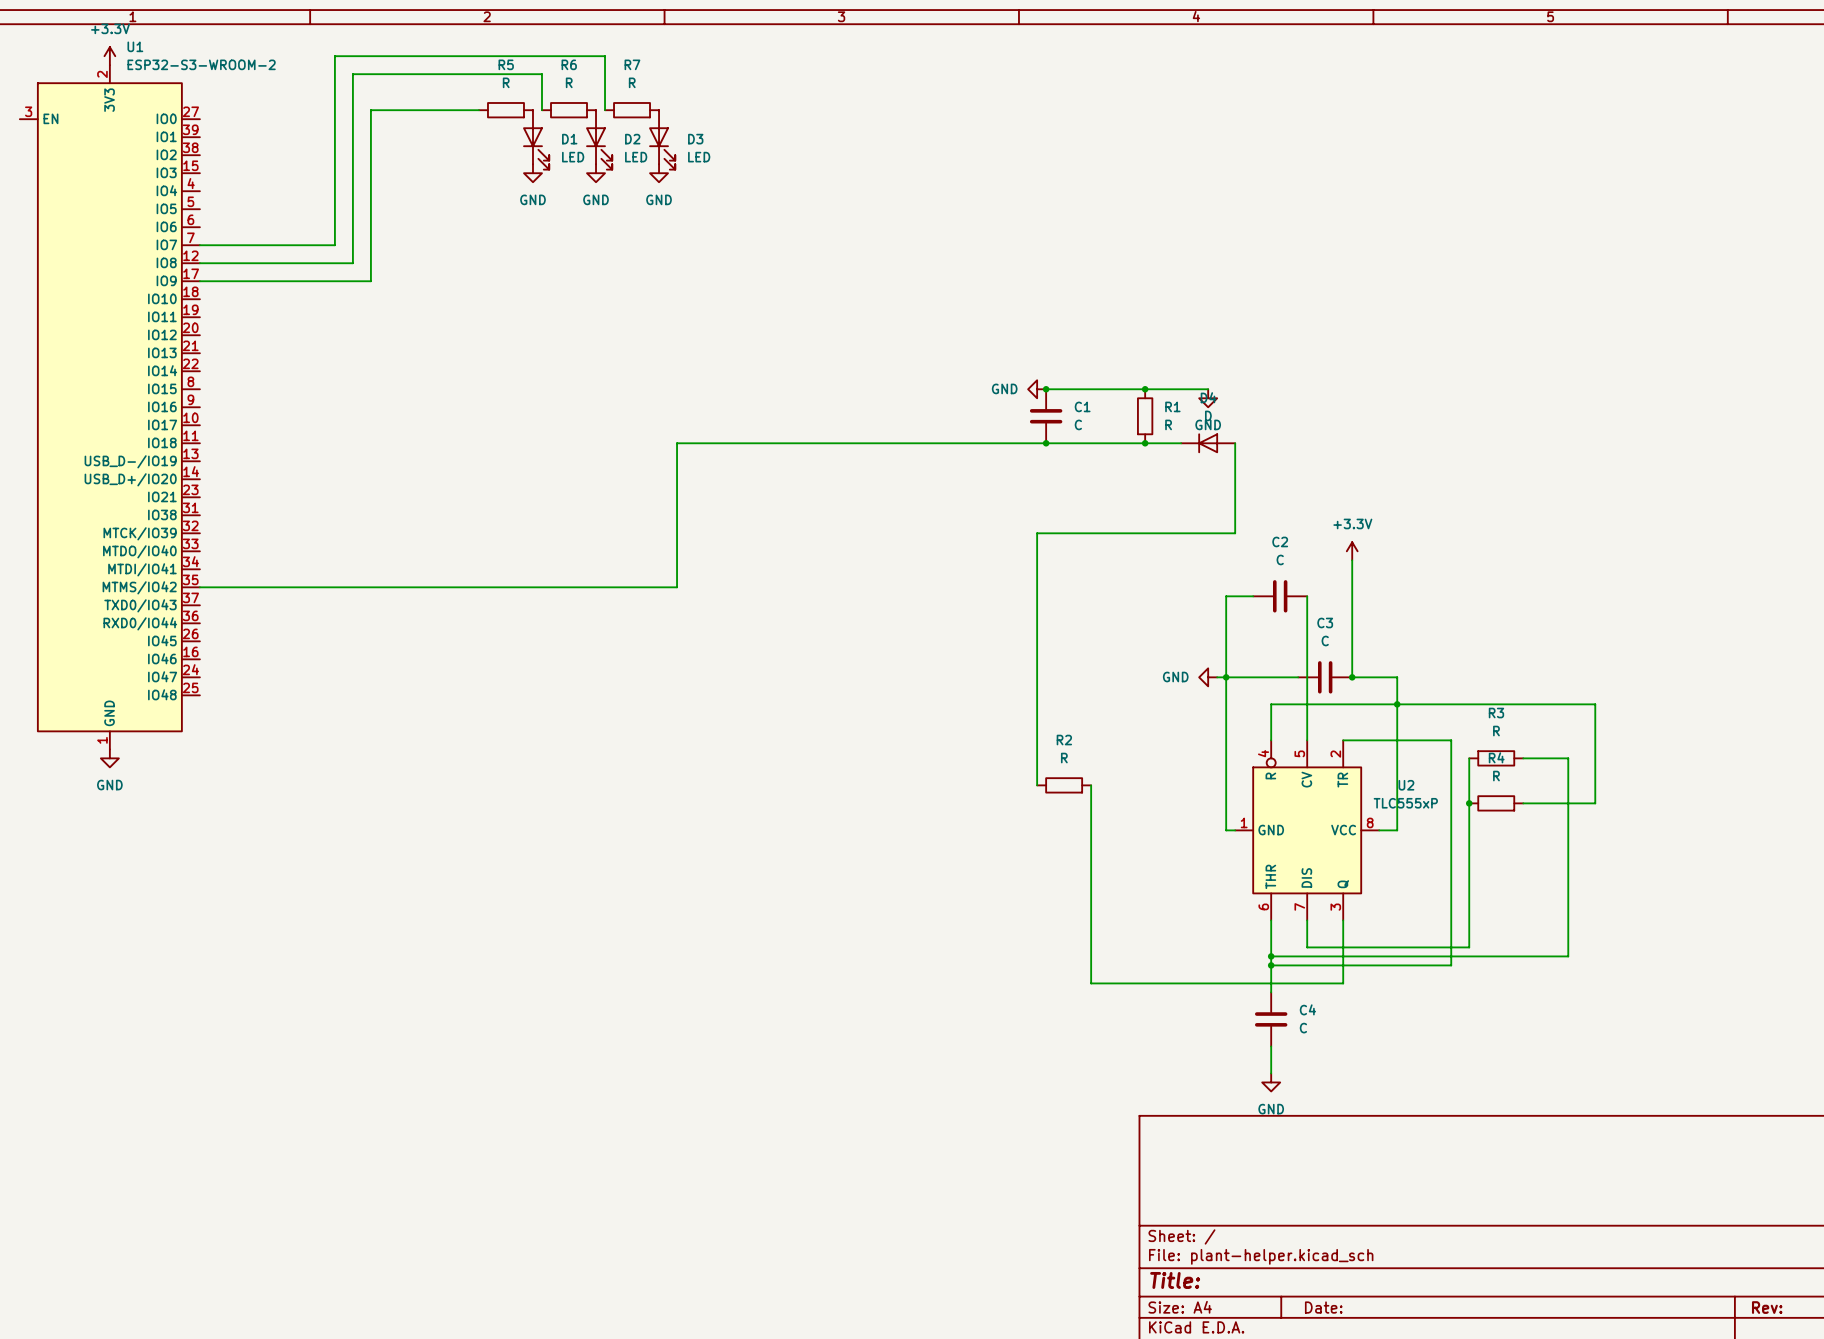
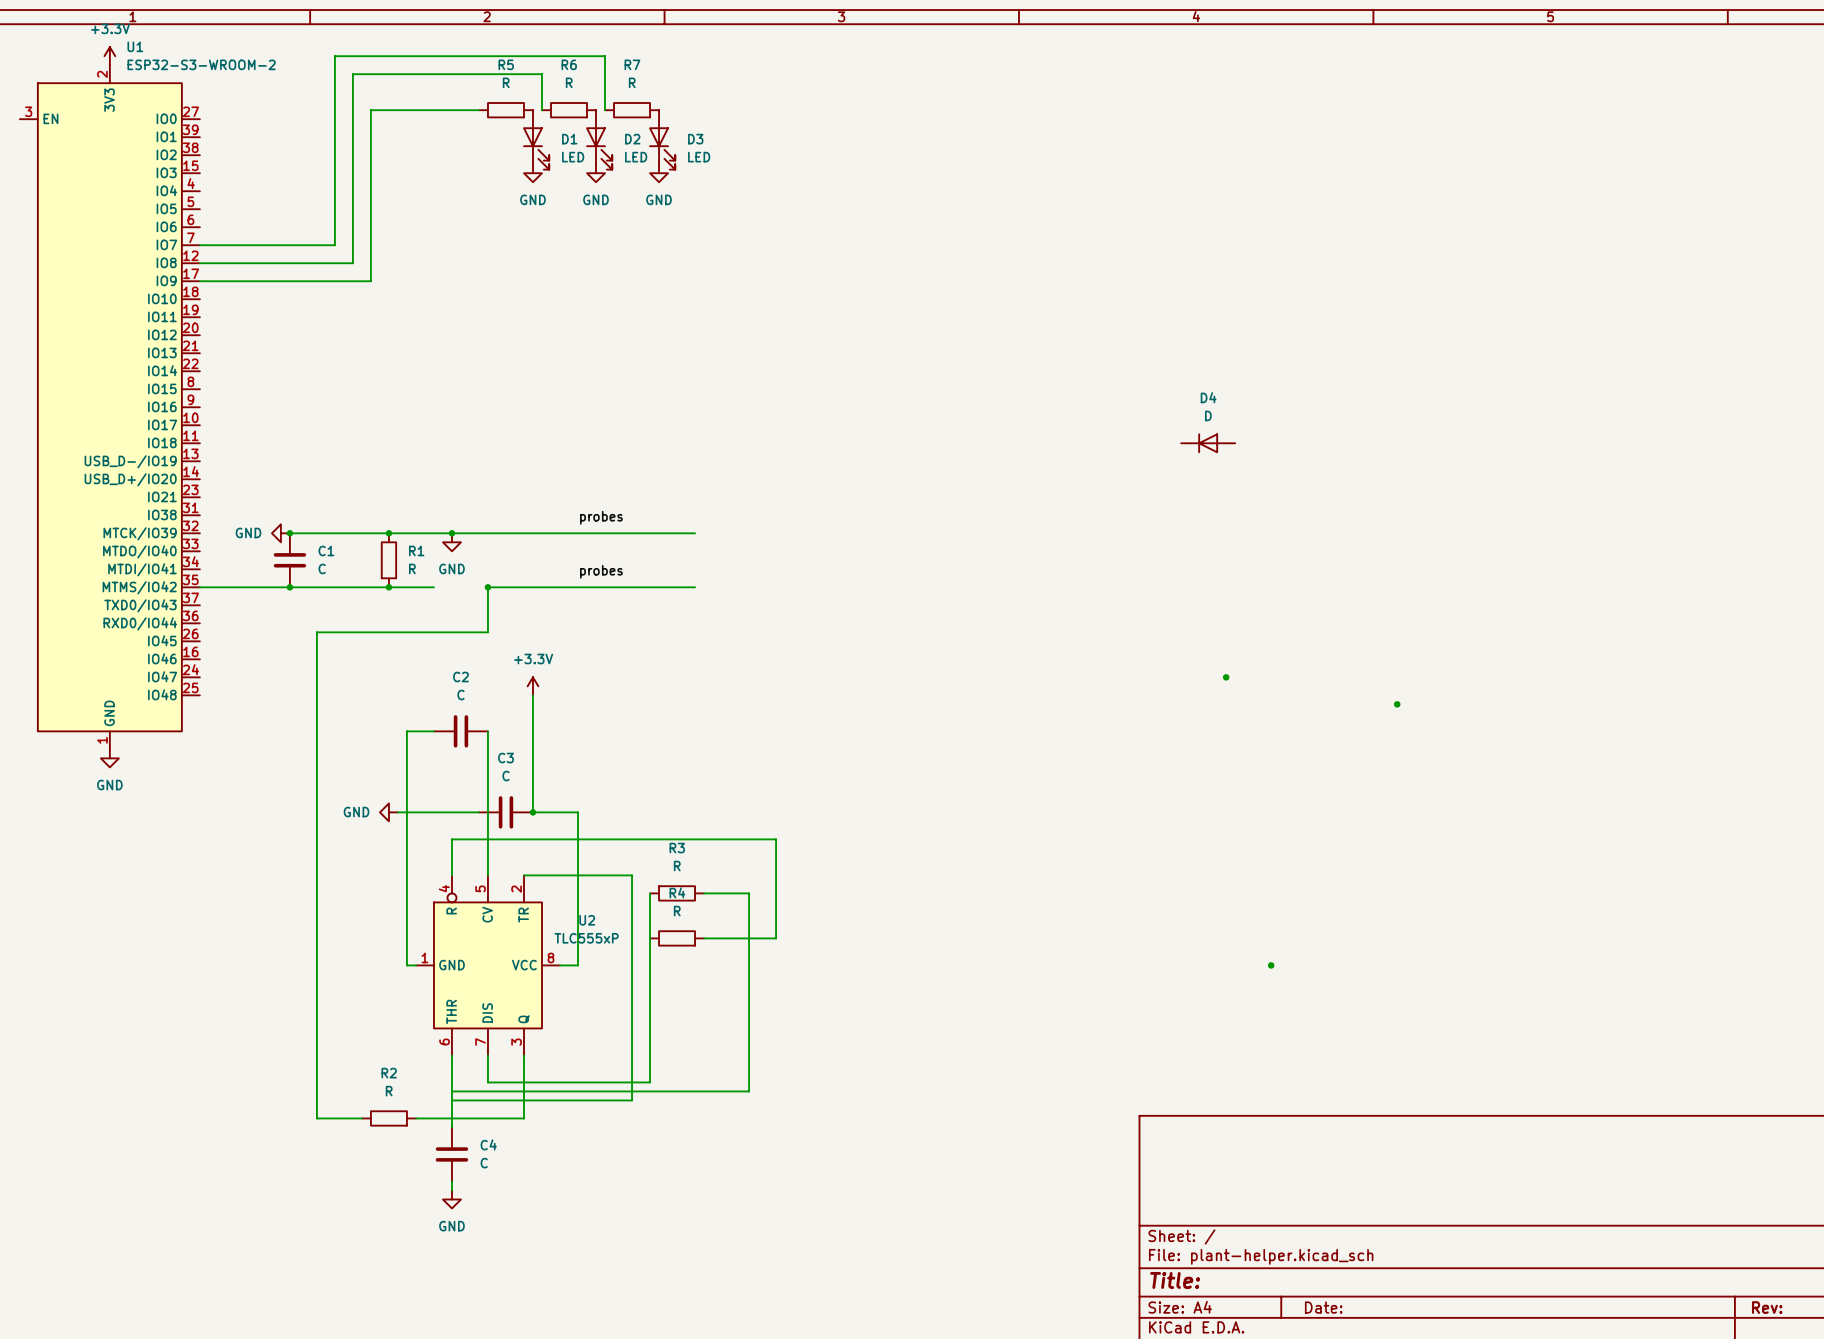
power symbol: GND (1037, 389) -> none
wire: (1046, 389) (1208, 389) -> none
junction: (1046, 389) -> none
junction: (1145, 389) -> none
power symbol: GND (1208, 398) -> none
C1 position: (1046, 416) -> (289, 560)
R1 position: (1145, 416) -> (388, 560)
junction: (1046, 443) -> none
junction: (1145, 443) -> none
wire: (1181, 443) (677, 443) (677, 587) -> (695, 587) (677, 587)
wire: (1235, 443) (1235, 533) (1037, 533) (1037, 785) -> none
label: none -> probes (601, 517)
power symbol: none -> GND (280, 533)
wire: none -> (289, 533) (695, 533)
junction: none -> (289, 533)
junction: none -> (388, 533)
junction: none -> (451, 533)
power symbol: none -> GND (451, 542)
power symbol: +3.3V (1352, 551) -> none
wire: (1352, 560) (1352, 677) (1397, 677) (1397, 830) (1379, 830) -> none
label: none -> probes (601, 571)
junction: none -> (289, 587)
junction: none -> (388, 587)
wire: (433, 587) (487, 587) -> (361, 1118) (316, 1118) (316, 632) (487, 632) (487, 587)
junction: none -> (487, 587)
wire: (1253, 596) (1226, 596) (1226, 830) (1235, 830) -> none
C2 position: (1280, 596) -> (460, 731)
wire: (1307, 596) (1307, 740) -> none
power symbol: GND (1208, 677) -> none
wire: (1217, 677) (1298, 677) -> none
C3 position: (1325, 677) -> (505, 812)
junction: (1352, 677) -> none
power symbol: none -> +3.3V (532, 686)
wire: none -> (532, 695) (532, 812) (578, 812) (578, 965) (560, 965)
wire: none -> (433, 731) (406, 731) (406, 965) (415, 965)
wire: none -> (487, 731) (487, 875)
wire: (1271, 740) (1271, 704) (1595, 704) (1595, 803) (1523, 803) -> none
wire: (1343, 740) (1451, 740) (1451, 965) (1271, 965) -> none
wire: (1469, 758) (1469, 947) (1307, 947) (1307, 920) -> none
R3 position: (1496, 758) -> (677, 893)
wire: (1523, 758) (1568, 758) (1568, 956) (1271, 956) -> none
R2 position: (1064, 785) -> (388, 1118)
wire: (1091, 785) (1091, 983) (1343, 983) (1343, 920) -> none
junction: (1469, 803) -> none
R4 position: (1496, 803) -> (677, 938)
power symbol: none -> GND (388, 812)
wire: none -> (397, 812) (478, 812)
junction: none -> (532, 812)
U2 position: (1307, 830) -> (487, 965)
wire: none -> (451, 875) (451, 839) (776, 839) (776, 938) (704, 938)
wire: none -> (523, 875) (632, 875) (632, 1100) (451, 1100)
wire: none -> (650, 893) (650, 1082) (487, 1082) (487, 1055)
wire: none -> (704, 893) (749, 893) (749, 1091) (451, 1091)
wire: (1271, 920) (1271, 992) -> none
junction: (1271, 956) -> none
C4 position: (1271, 1019) -> (451, 1154)
wire: (1271, 1046) (1271, 1073) -> none
wire: none -> (451, 1055) (451, 1127)
wire: none -> (523, 1055) (523, 1118) (415, 1118)
power symbol: GND (1271, 1082) -> none
wire: none -> (451, 1181) (451, 1190)
power symbol: none -> GND (451, 1199)

